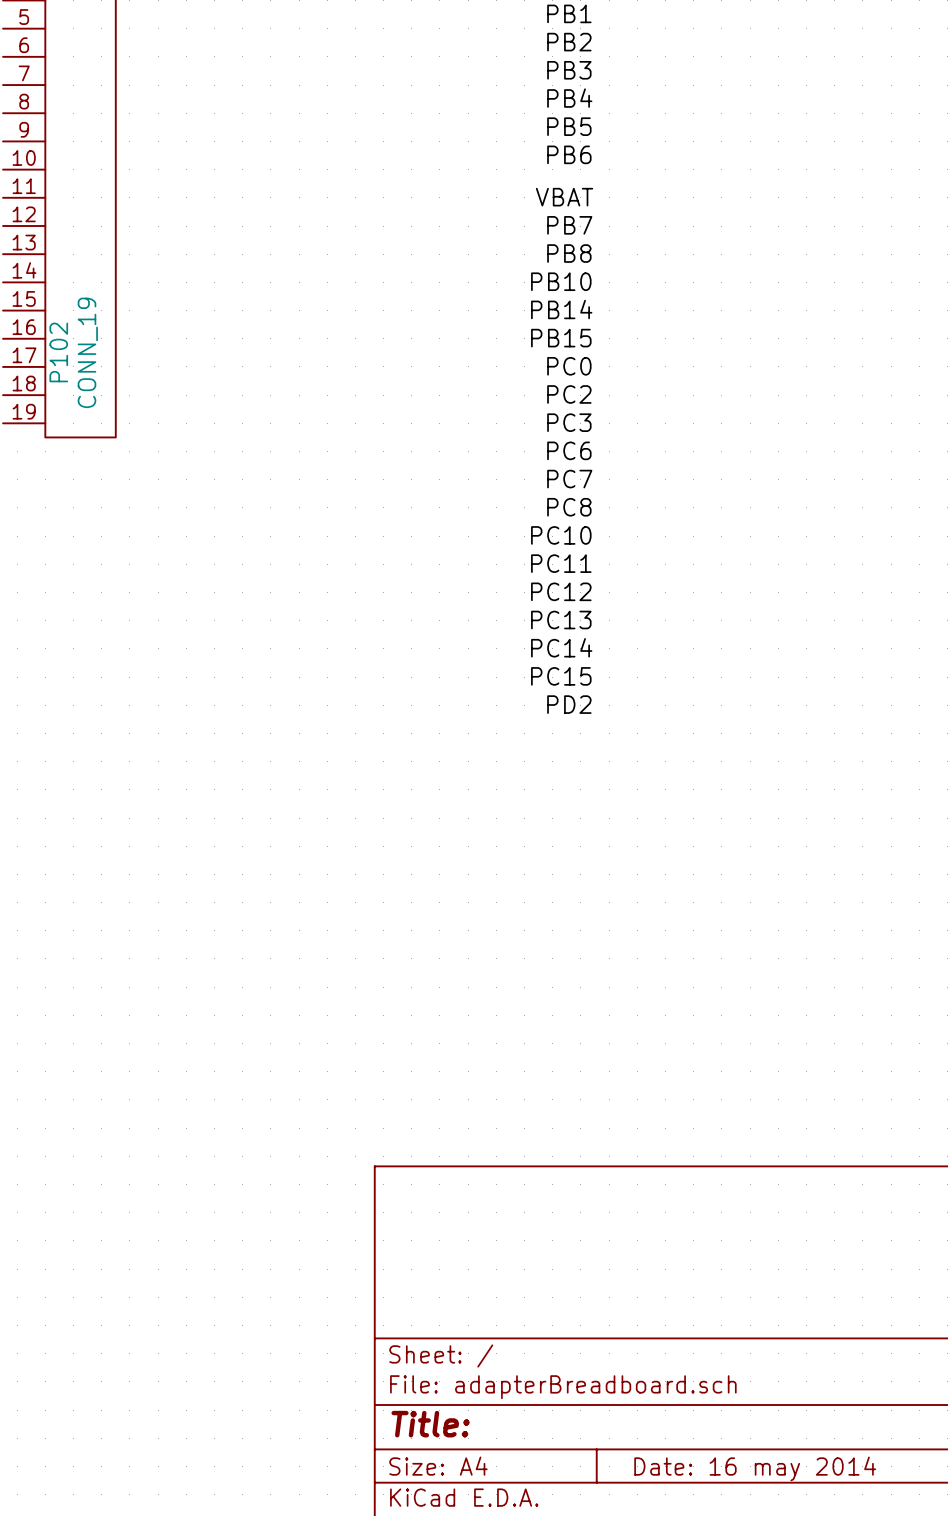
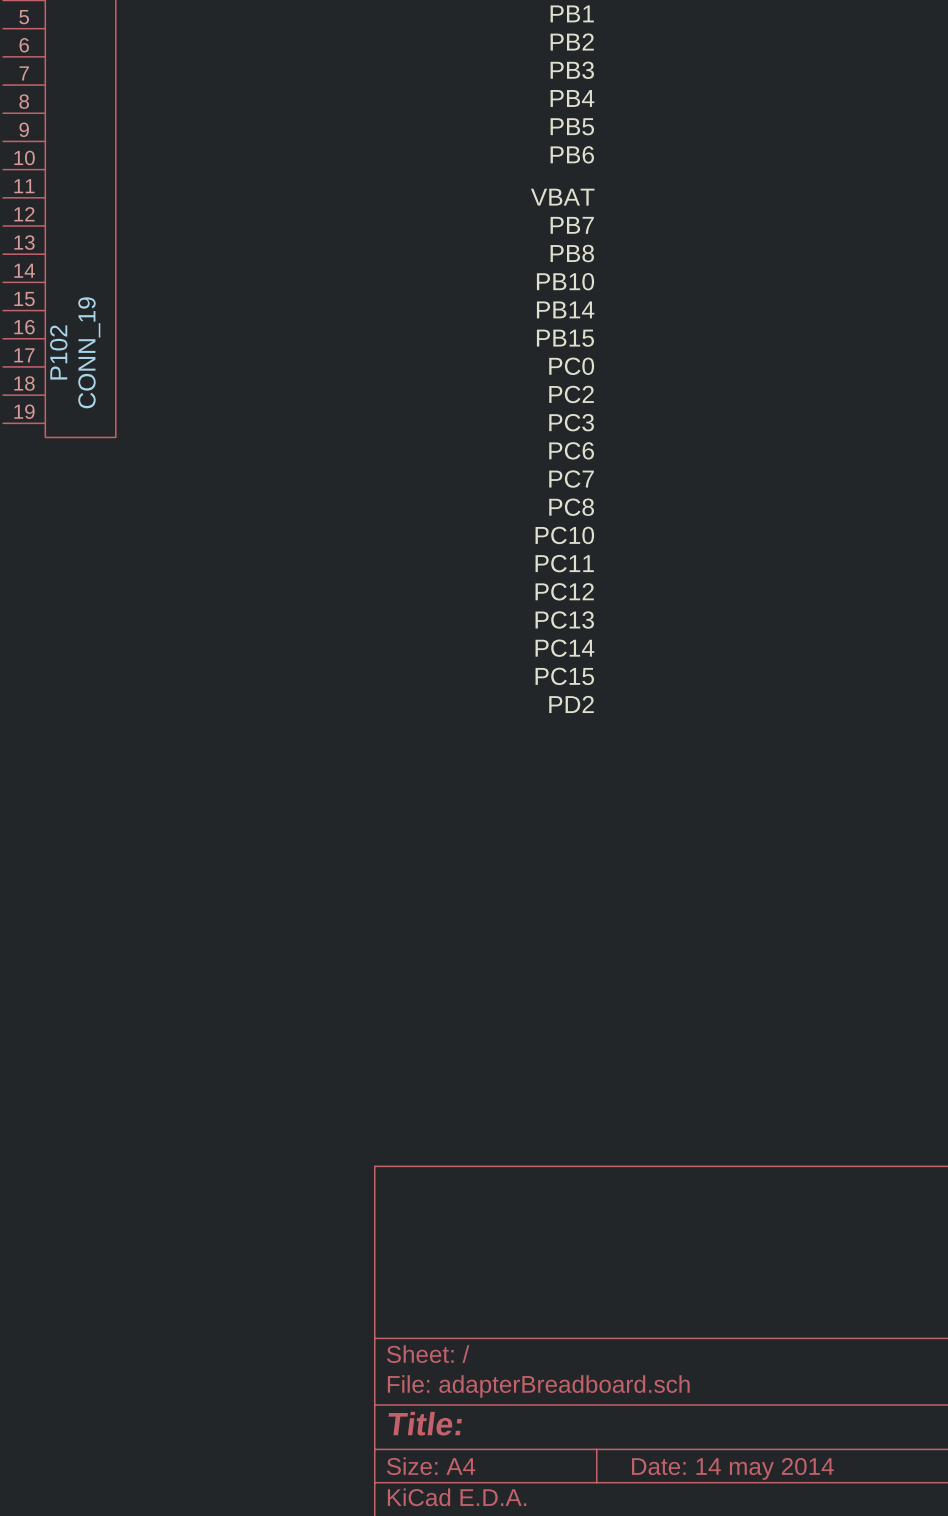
title block: Date: 16 may 2014 (755, 1468) -> Date: 14 may 2014 (732, 1468)

